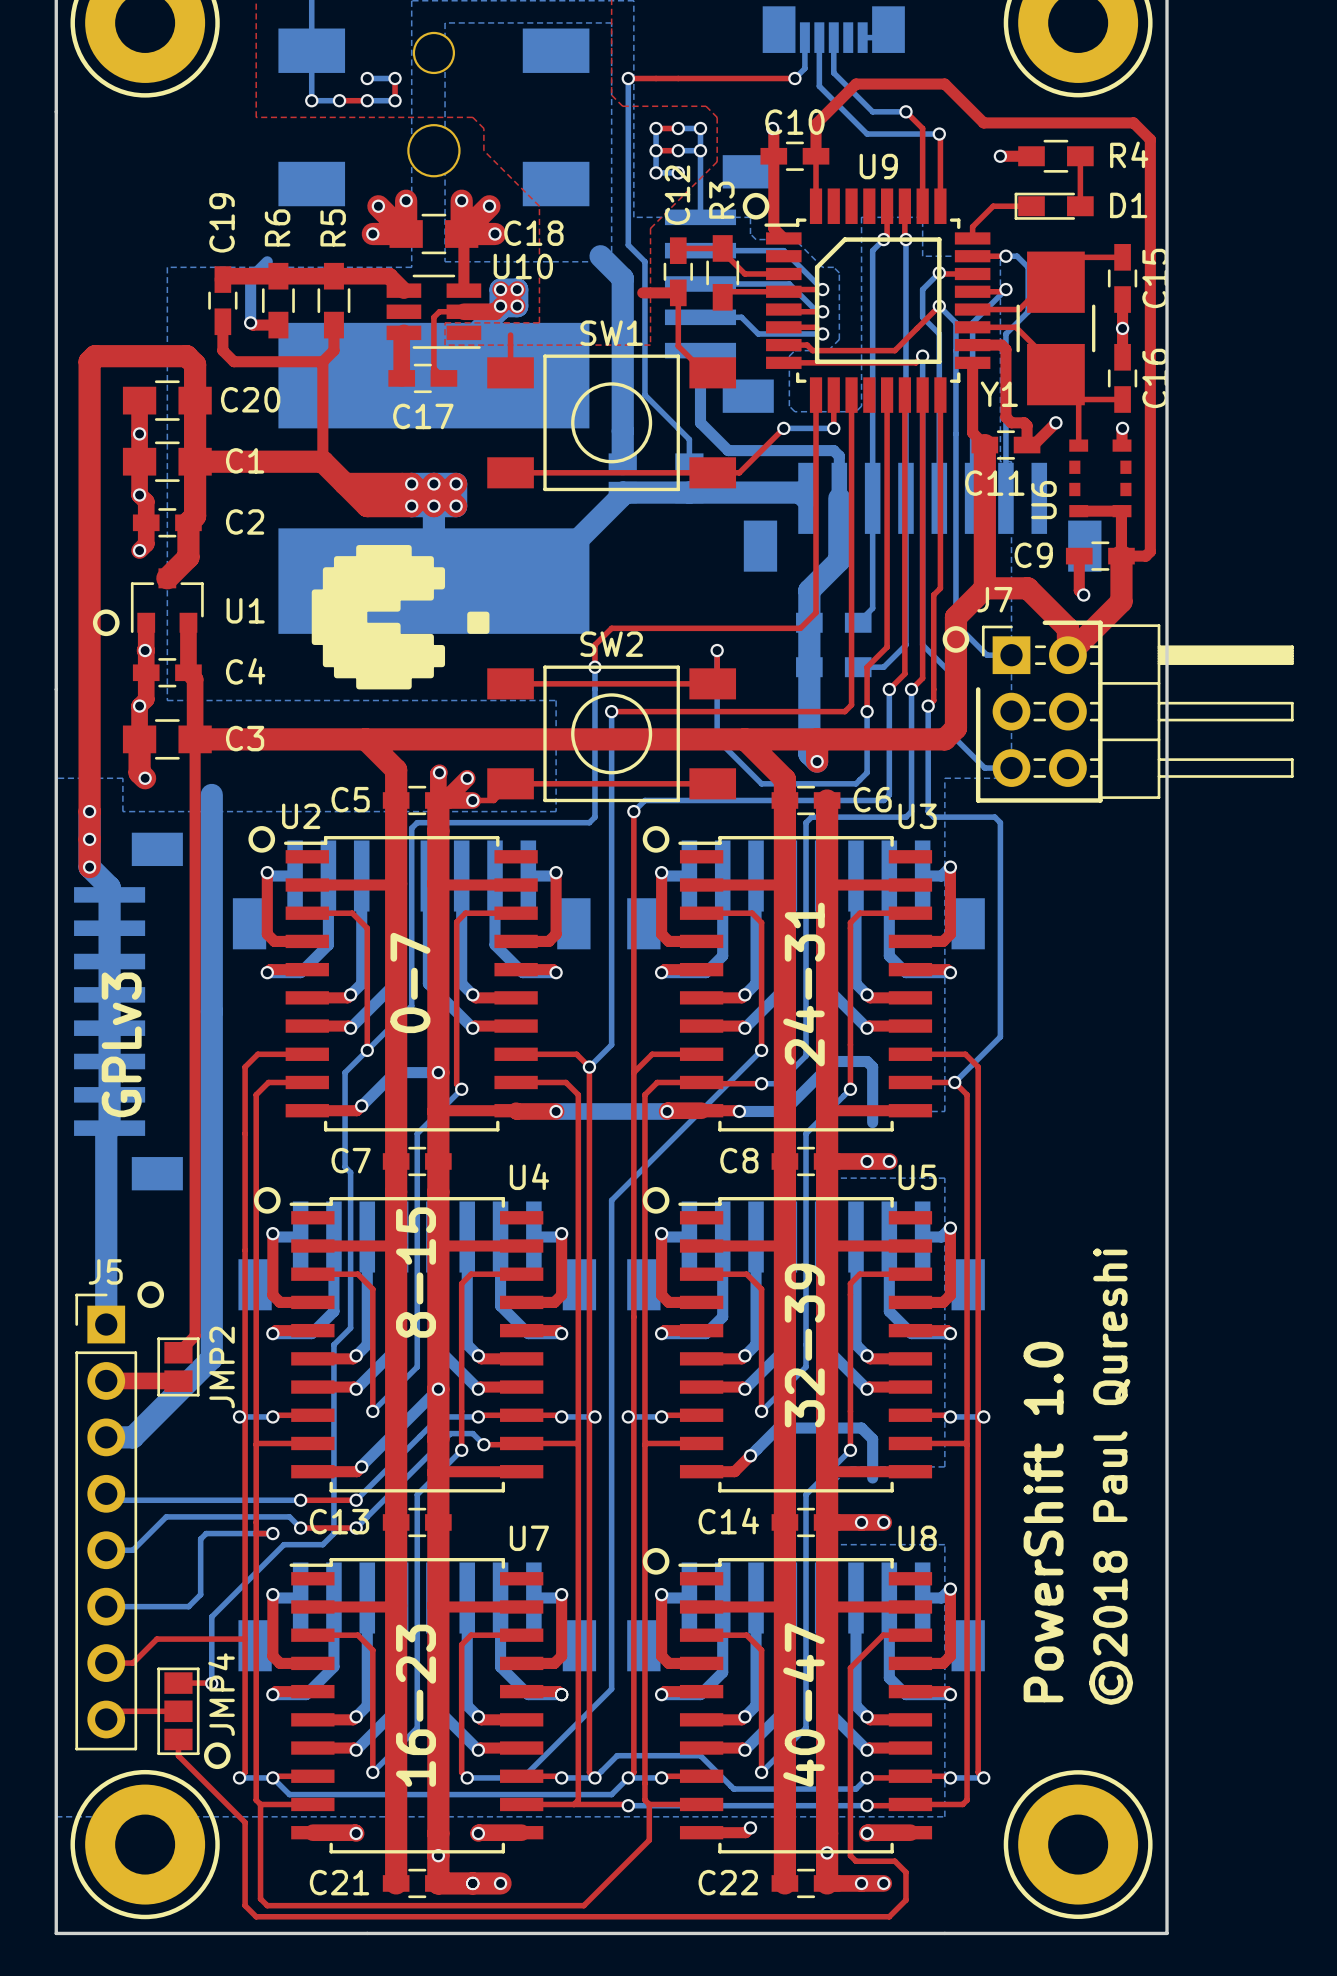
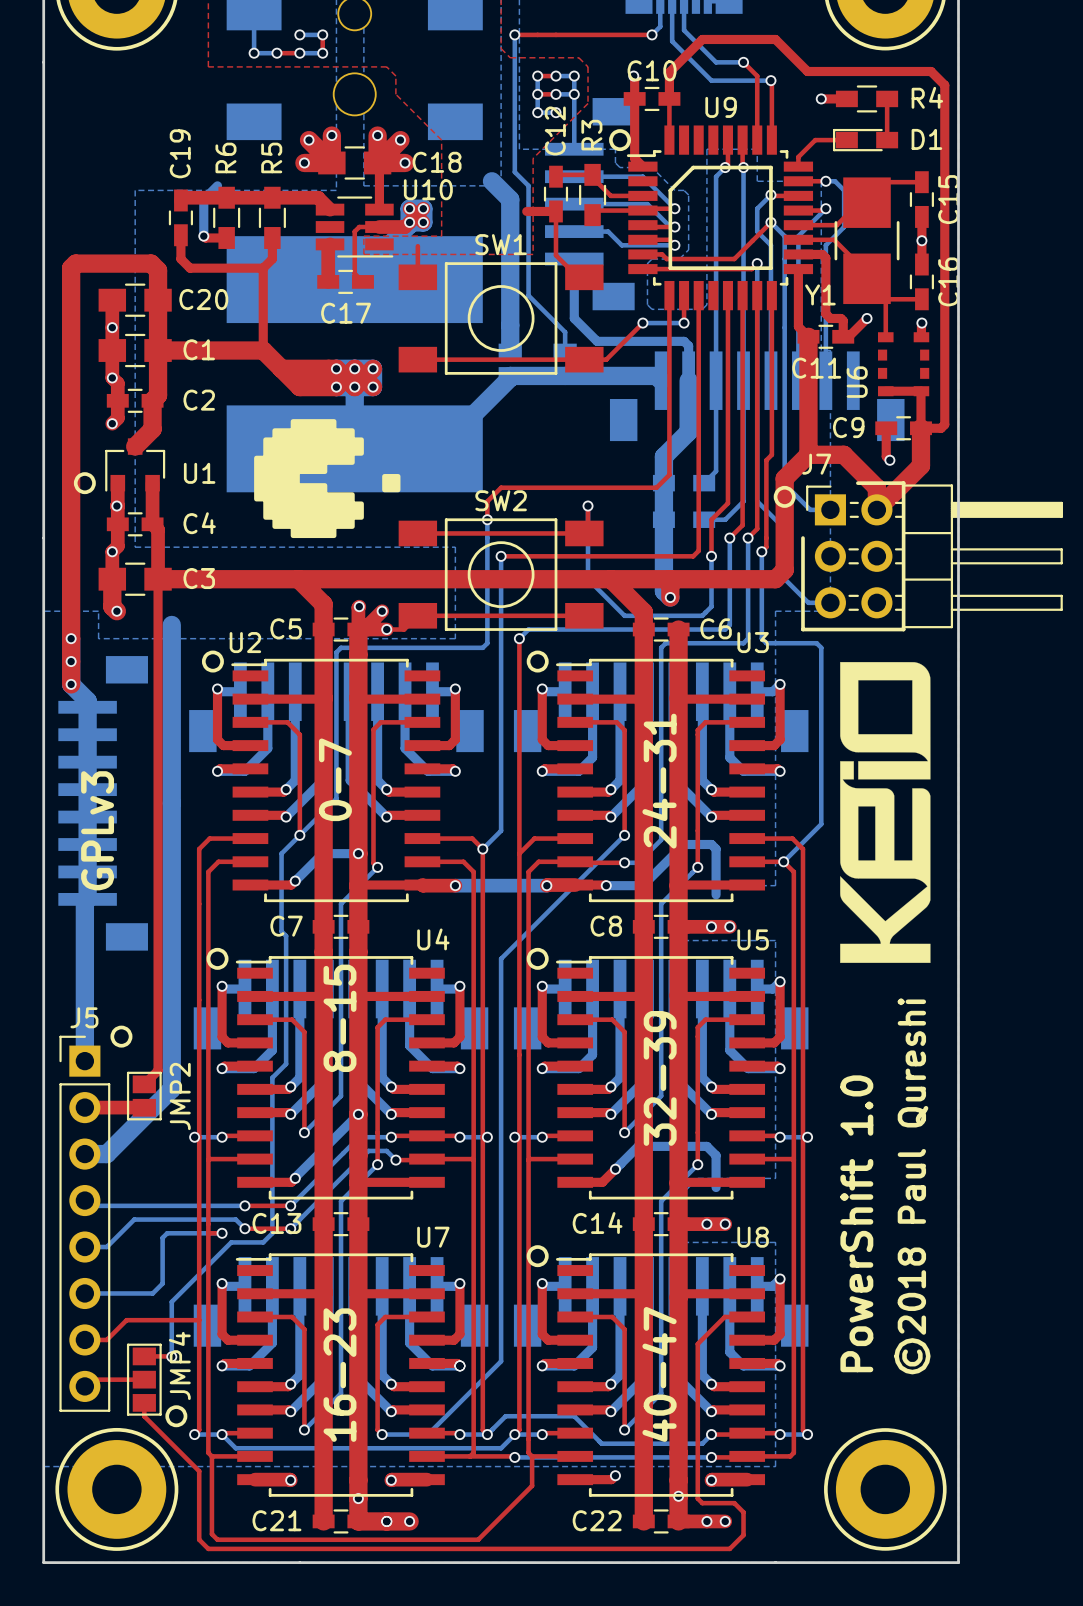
drawing: none -> [840, 662, 931, 963]

